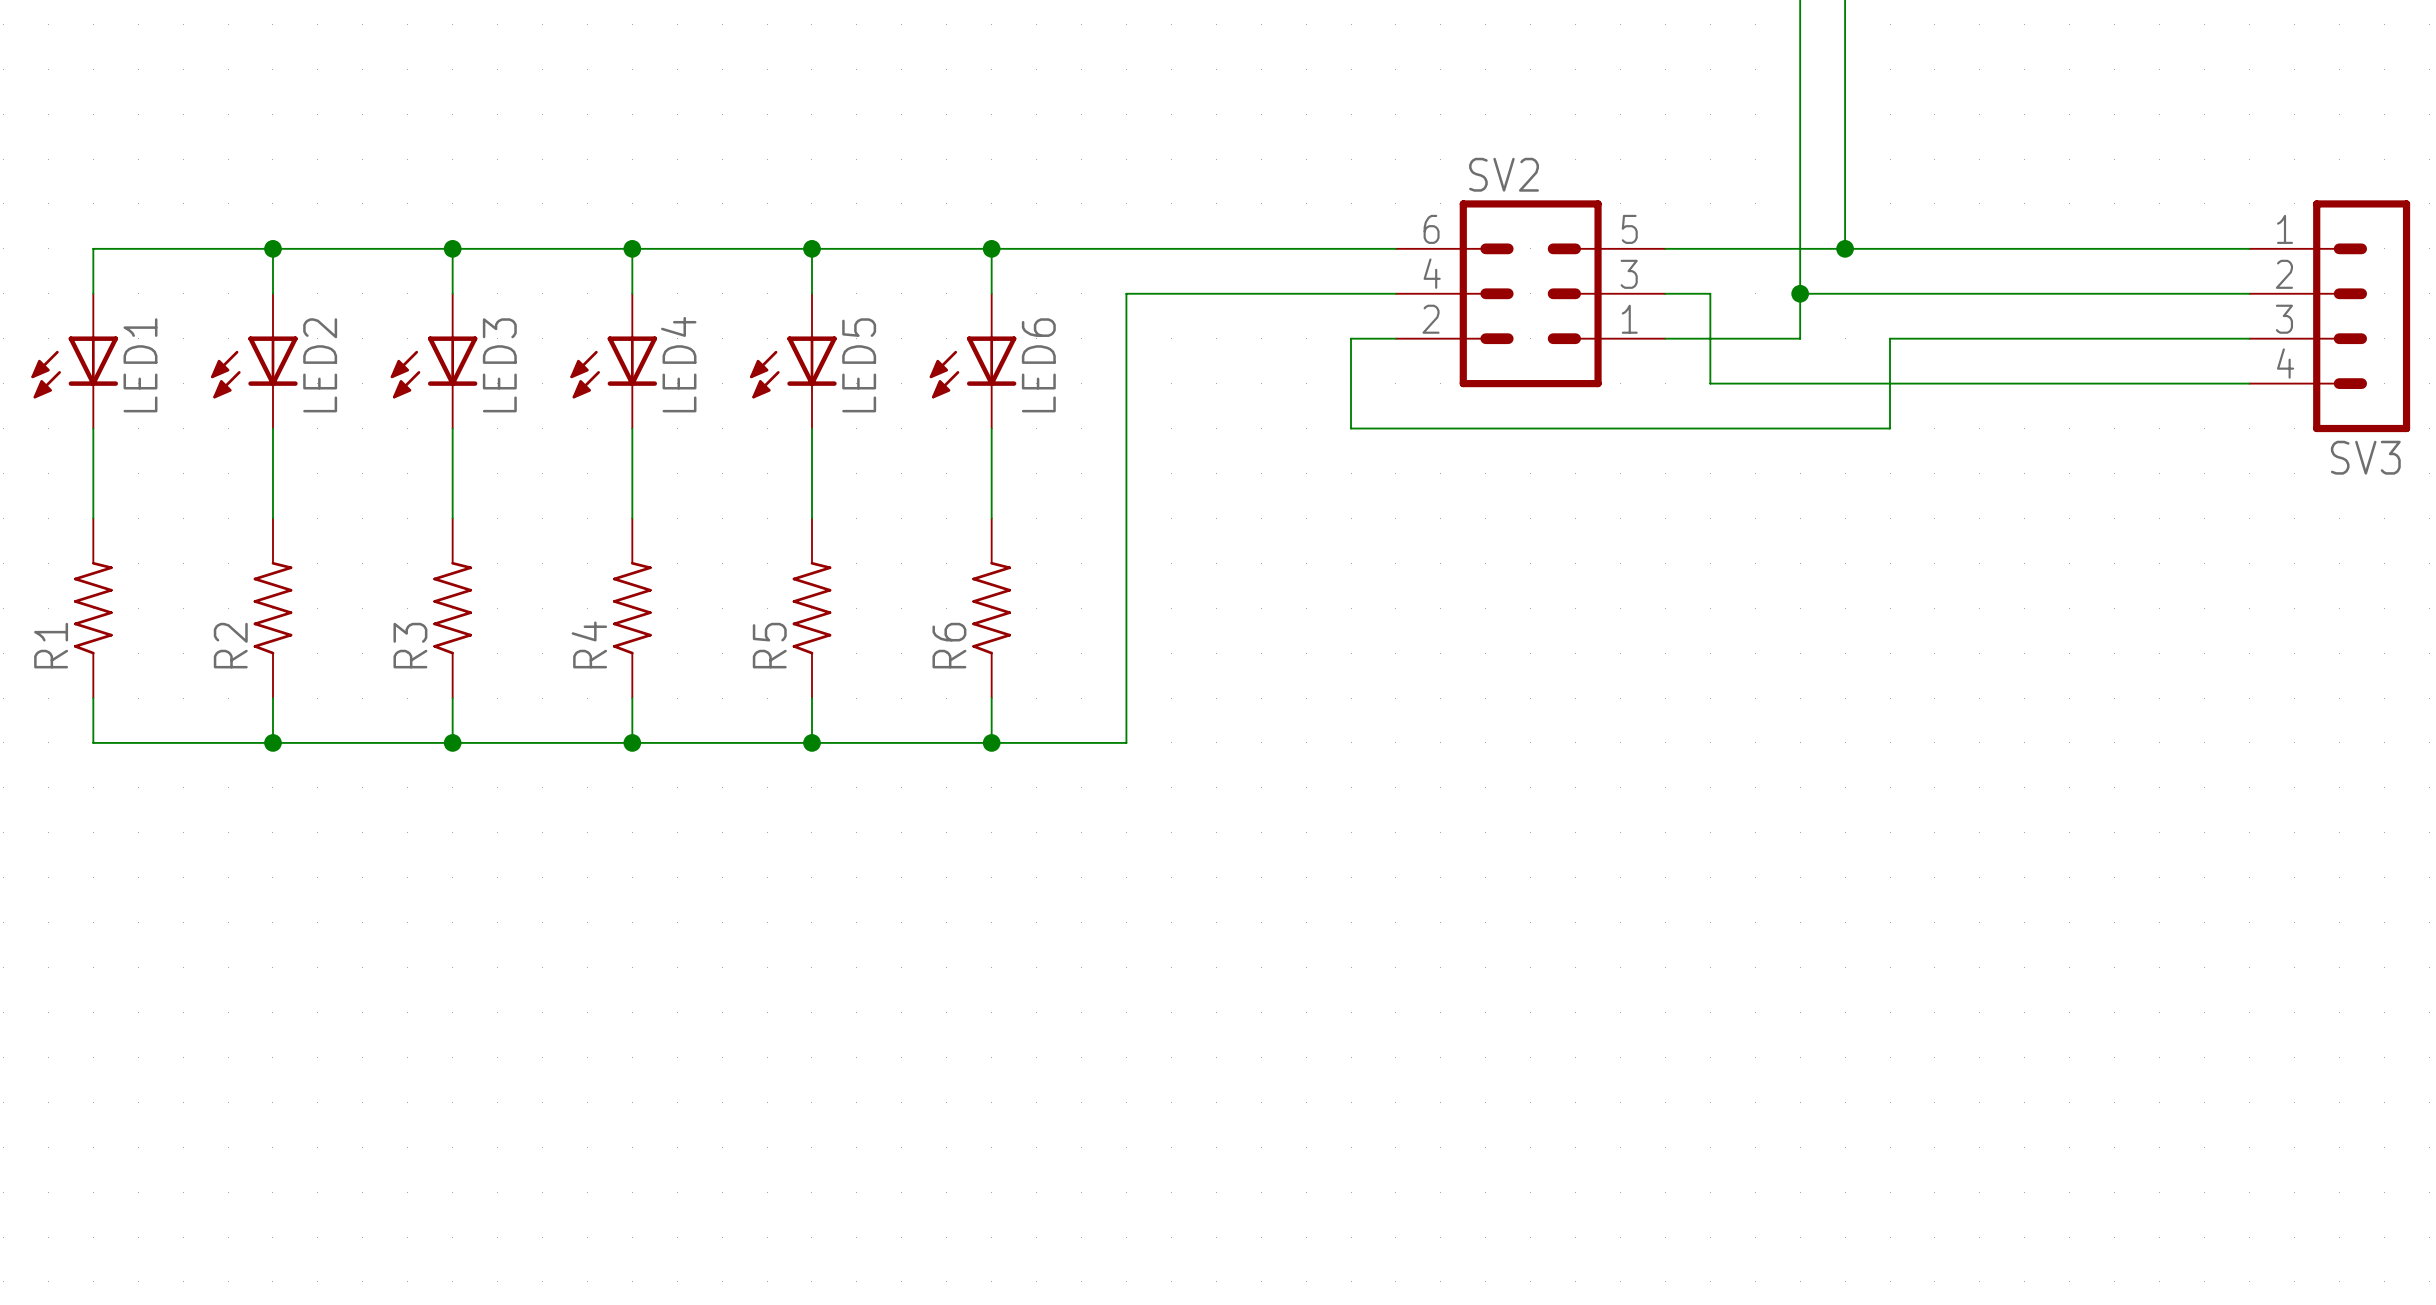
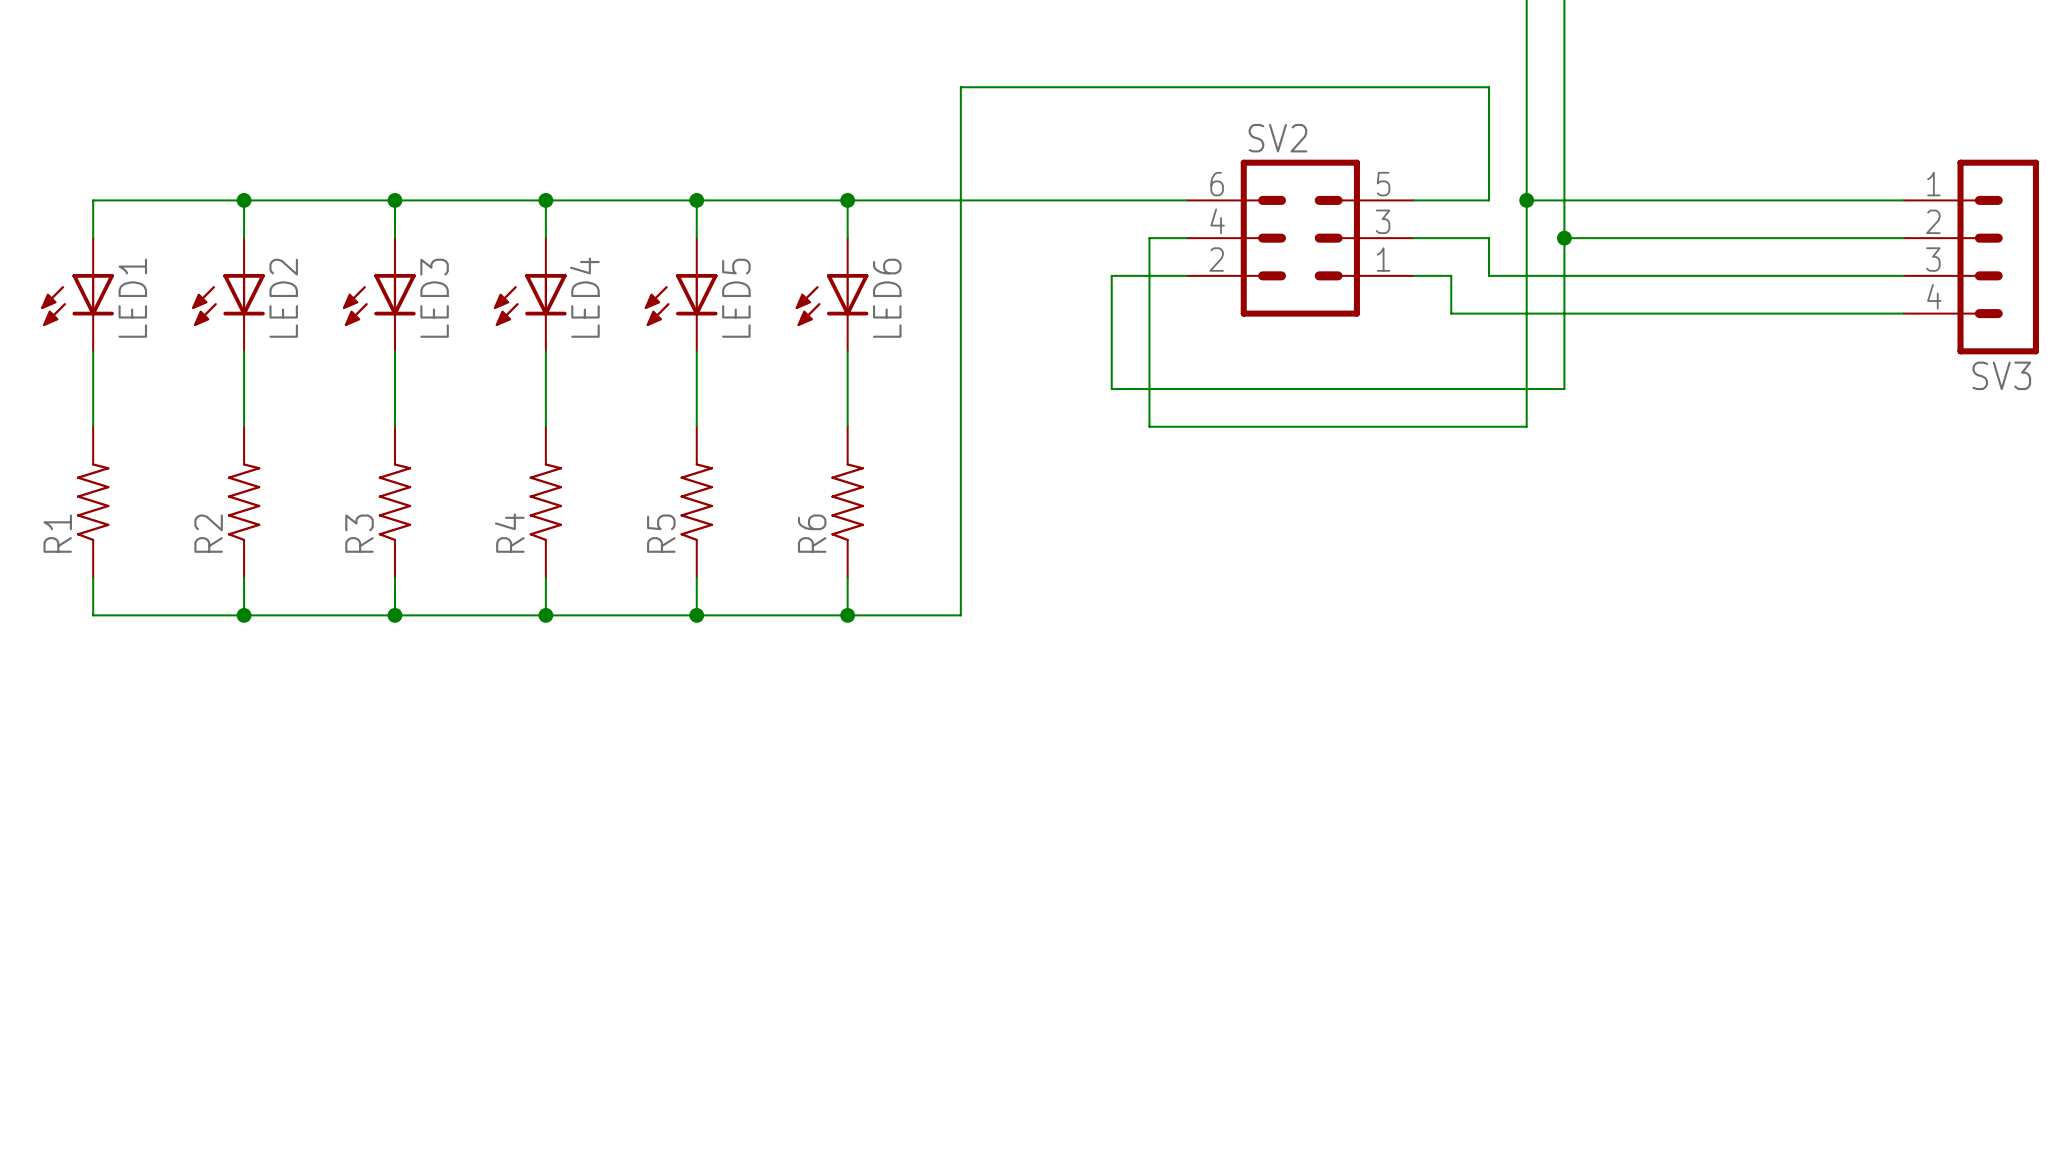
wire: (1755, 248) (1800, 248) -> none
junction: none -> (1526, 200)
wire: none -> (1564, 200) (1564, 389) (1111, 389) (1111, 275) (1149, 275) (1149, 238)
junction: (1845, 248) -> none
wire: (1126, 293) (1351, 293) -> (960, 238) (960, 87) (1488, 87) (1488, 200)
wire: (1710, 293) (1710, 338) (1755, 338) -> (1451, 238) (1488, 238) (1488, 275)
wire: (1800, 293) (1845, 293) -> none
junction: (1800, 293) -> none
junction: none -> (1564, 238)
wire: (1890, 338) (1890, 428) (1351, 428) -> (1602, 275) (1526, 275) (1526, 426) (1149, 426) (1149, 351)

